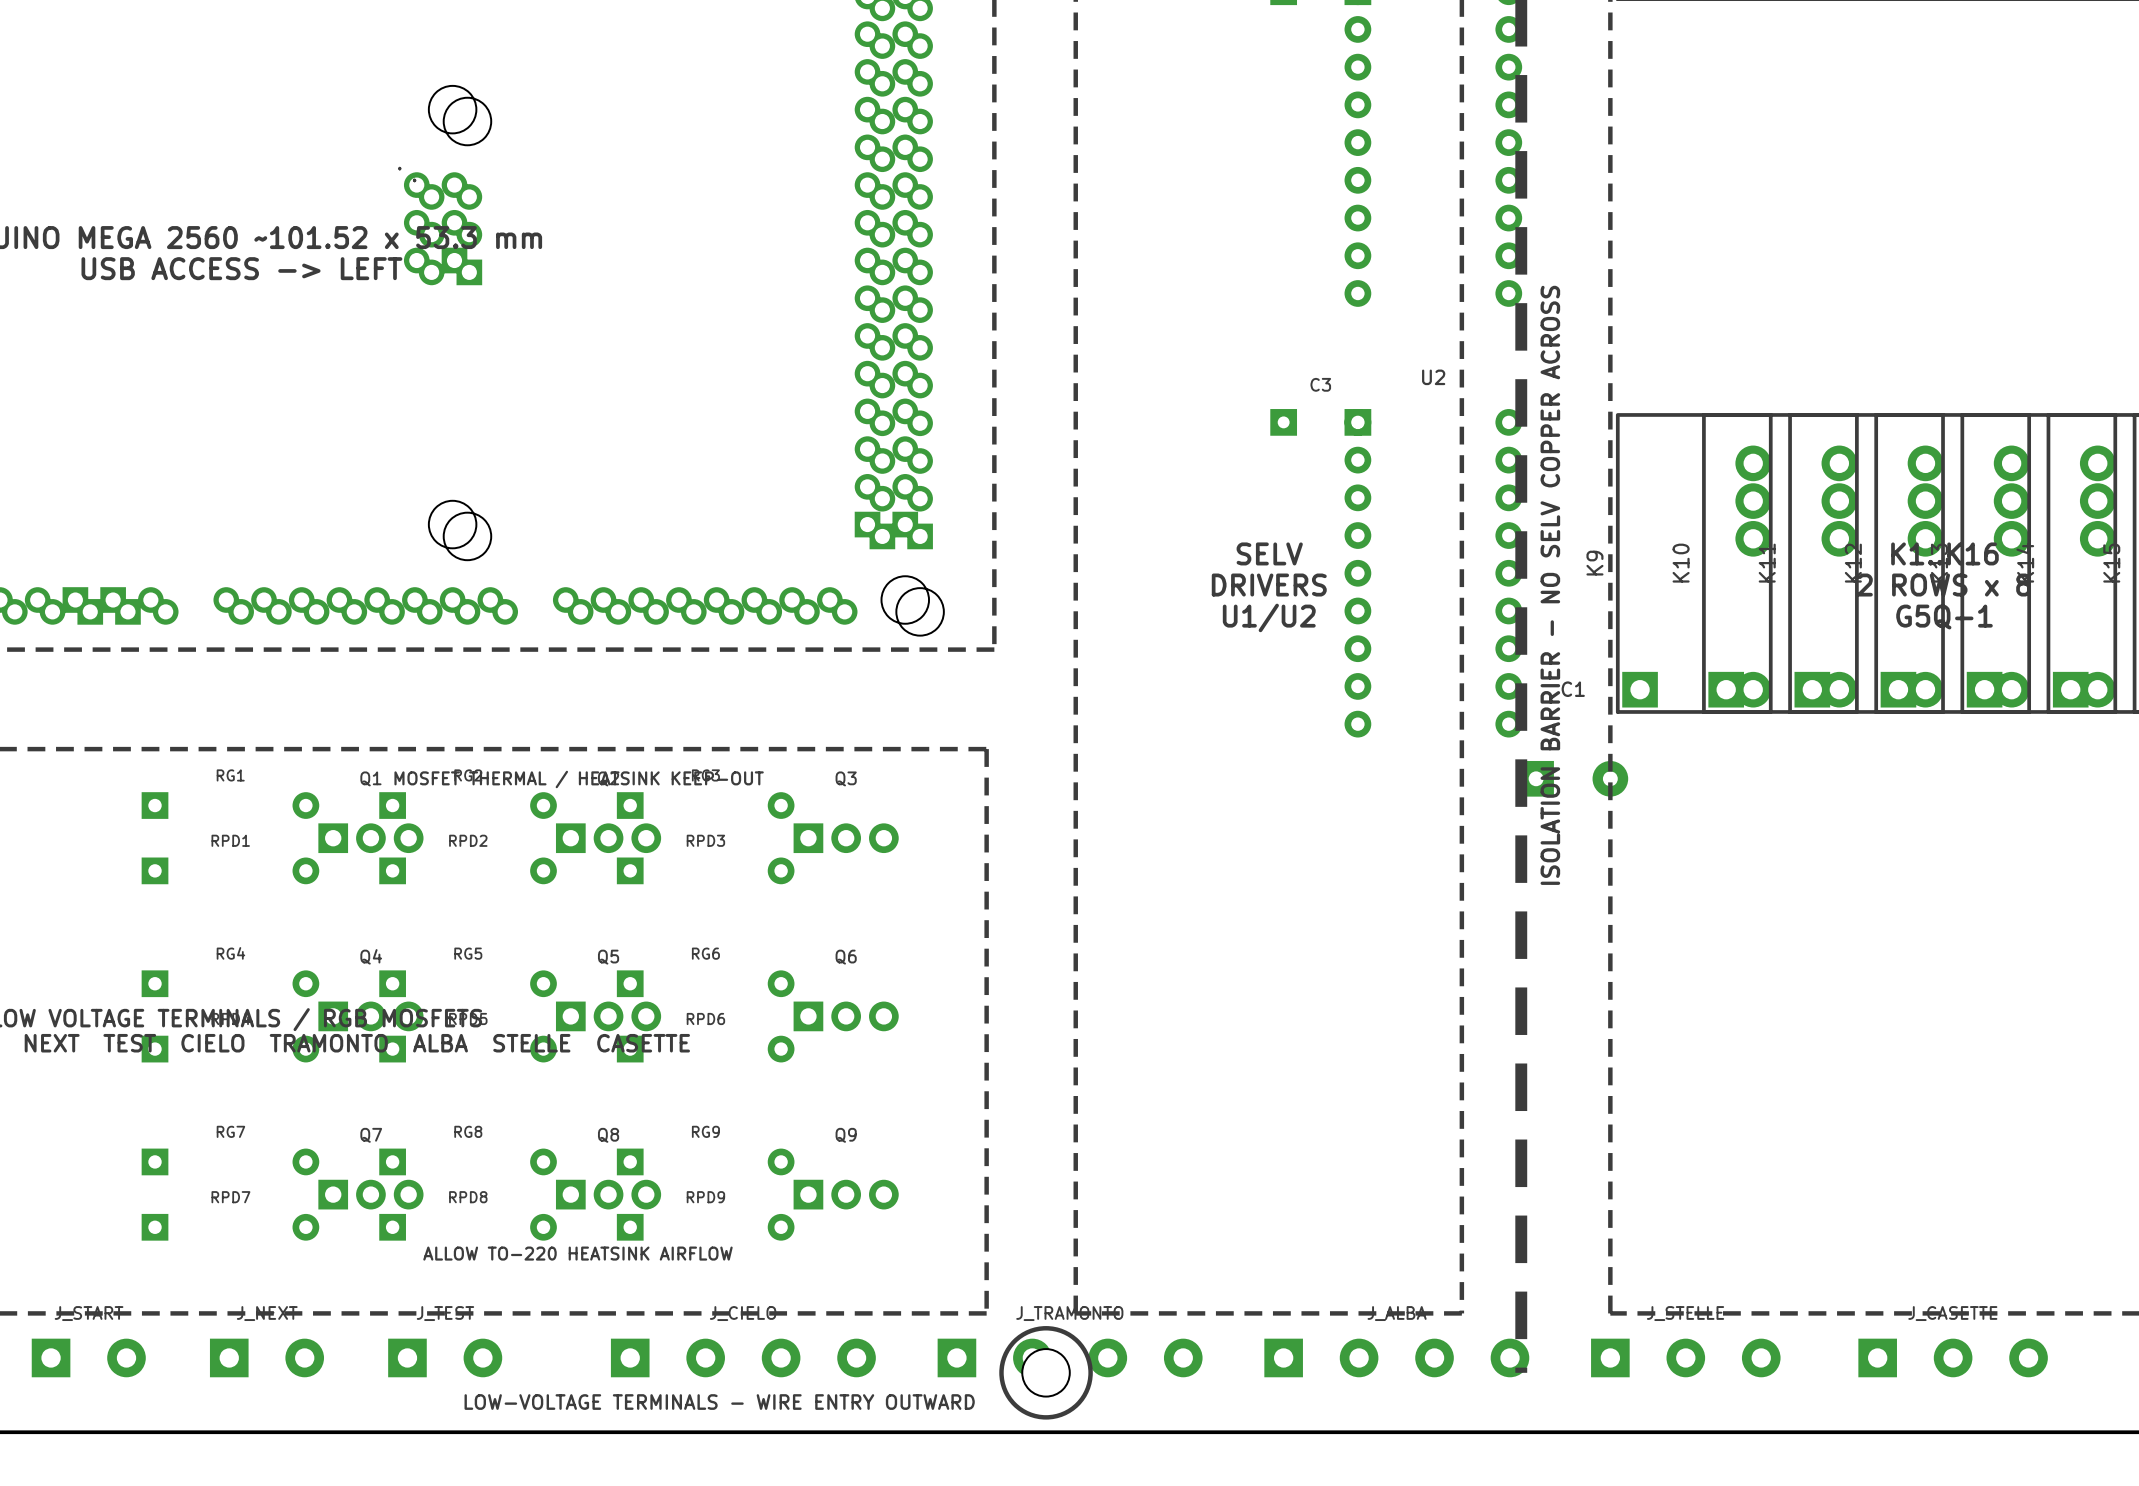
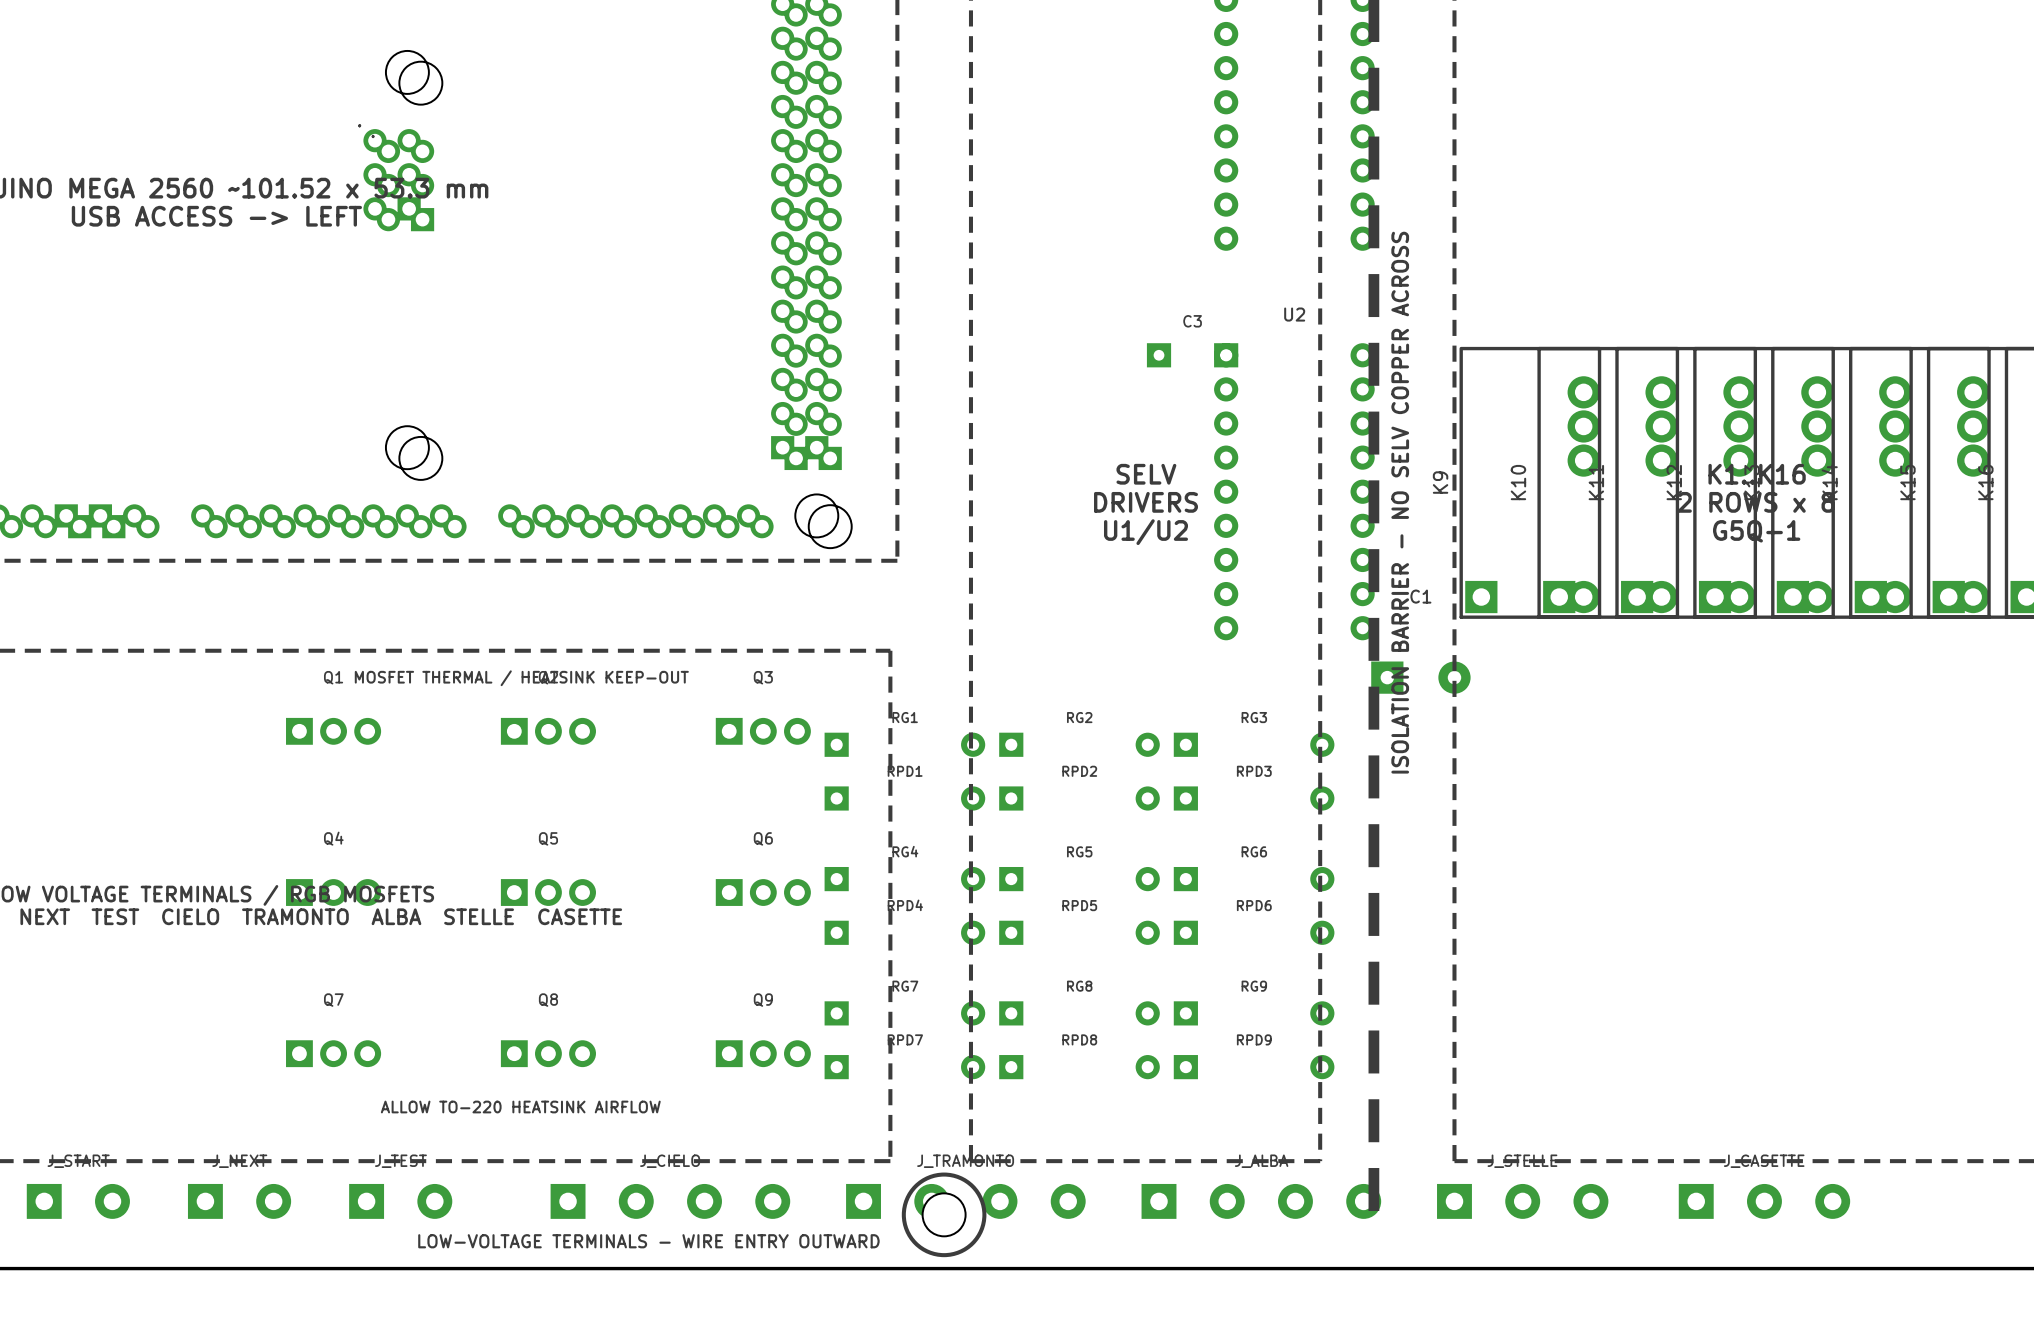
RG1 position: (230, 805) -> (904, 744)
RG2 position: (468, 805) -> (1079, 744)
RG3 position: (705, 805) -> (1254, 744)
RPD1 position: (230, 870) -> (904, 798)
RPD2 position: (468, 870) -> (1079, 798)
RPD3 position: (705, 870) -> (1254, 798)
RG4 position: (230, 983) -> (904, 879)
RG5 position: (468, 983) -> (1079, 879)
RG6 position: (705, 983) -> (1254, 879)
RPD4 position: (230, 1049) -> (904, 932)
RPD5 position: (468, 1049) -> (1079, 932)
RPD6 position: (705, 1049) -> (1254, 932)
RG7 position: (230, 1161) -> (904, 1013)
RG8 position: (468, 1161) -> (1079, 1013)
RG9 position: (705, 1161) -> (1254, 1013)
RPD7 position: (230, 1227) -> (904, 1067)
RPD8 position: (468, 1227) -> (1079, 1067)
RPD9 position: (705, 1227) -> (1254, 1067)

